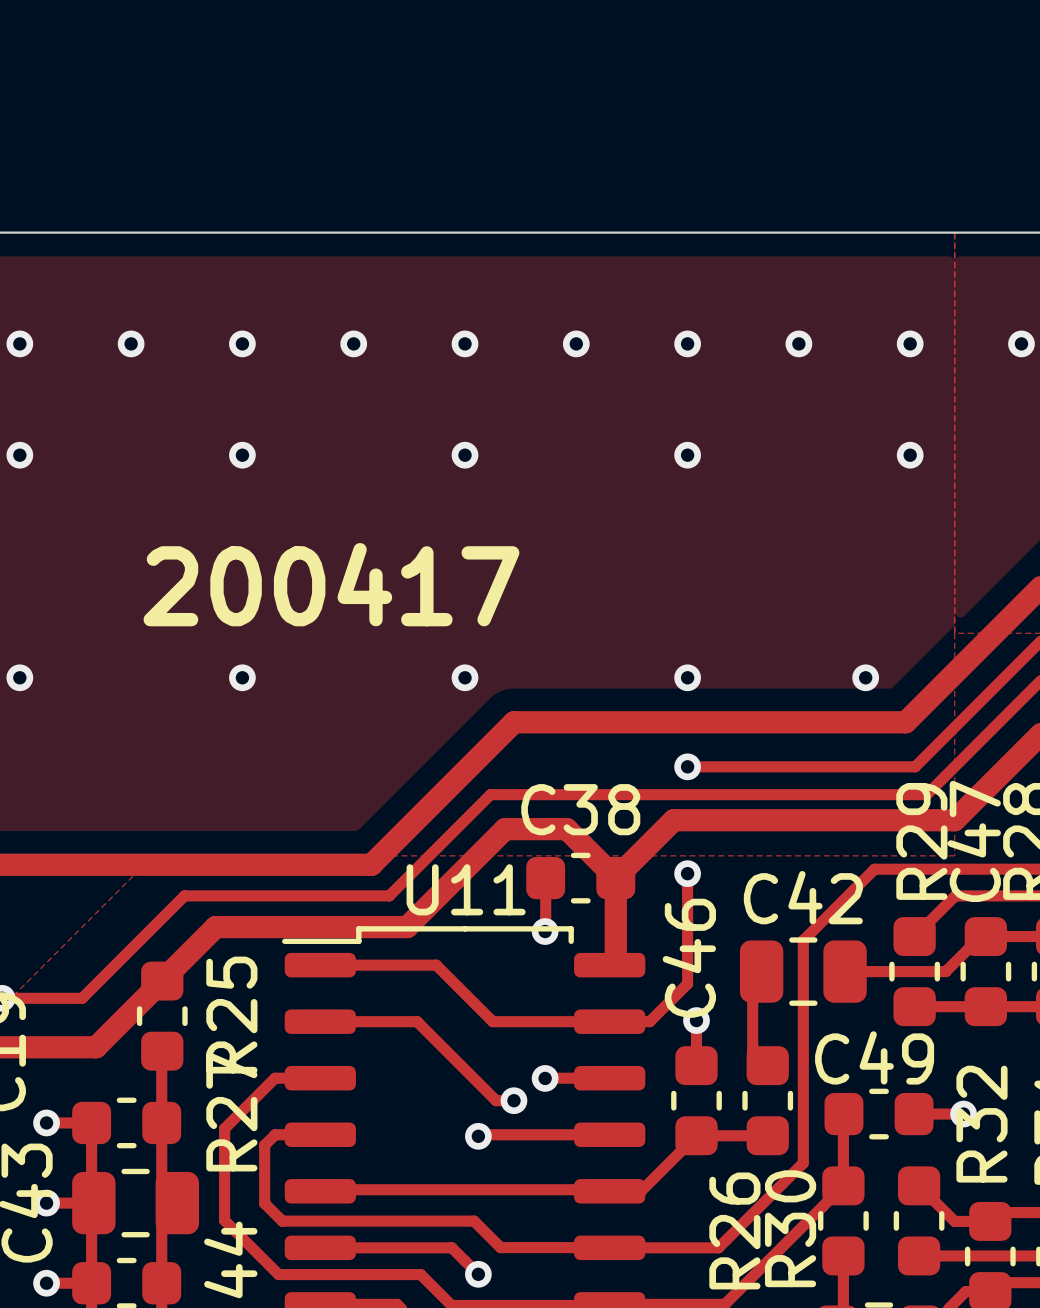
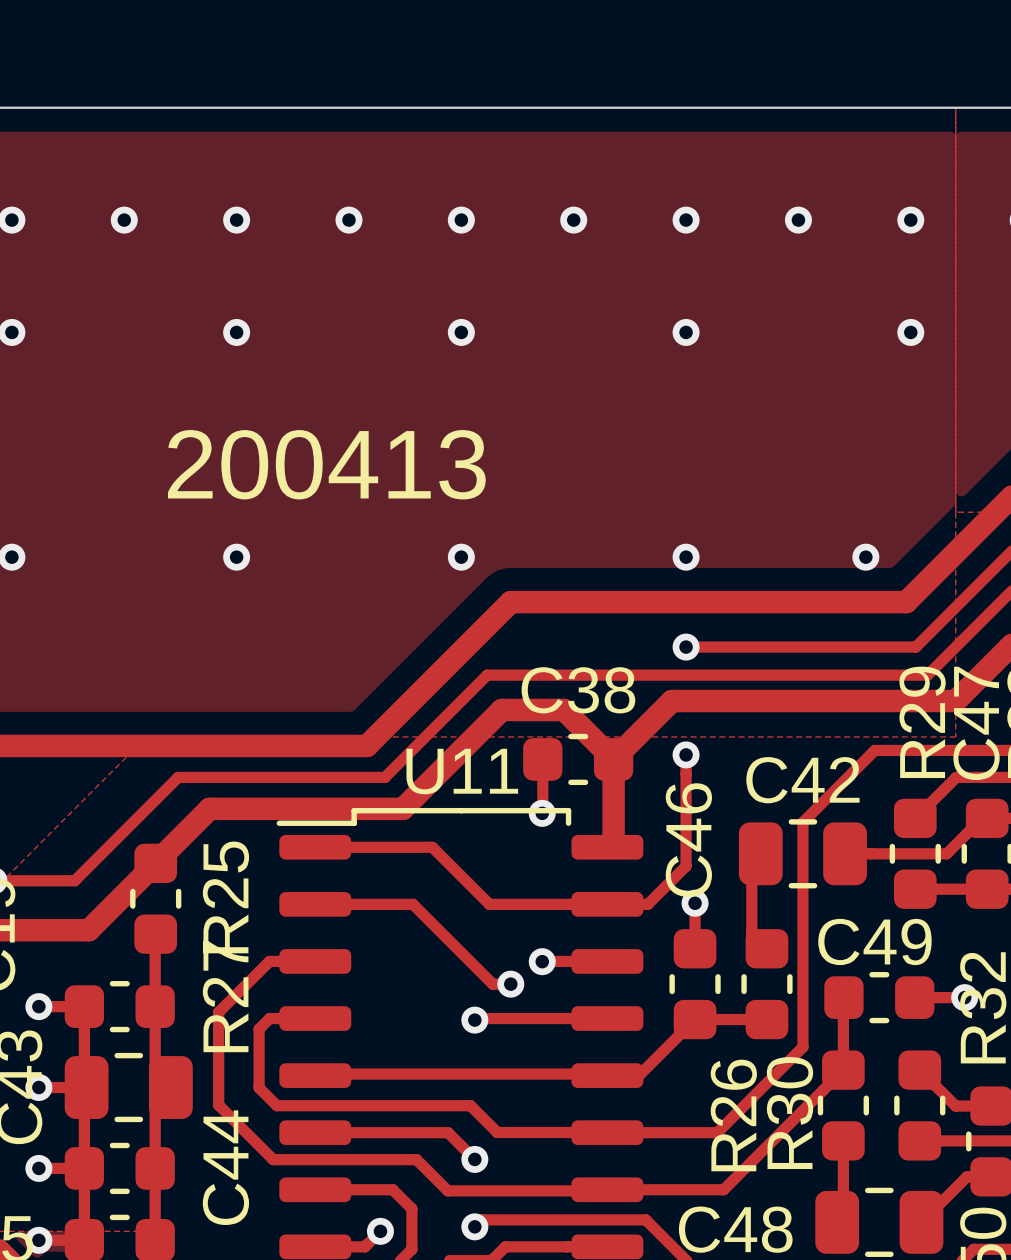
text: 200417 (331, 584) -> 200413 (326, 464)

